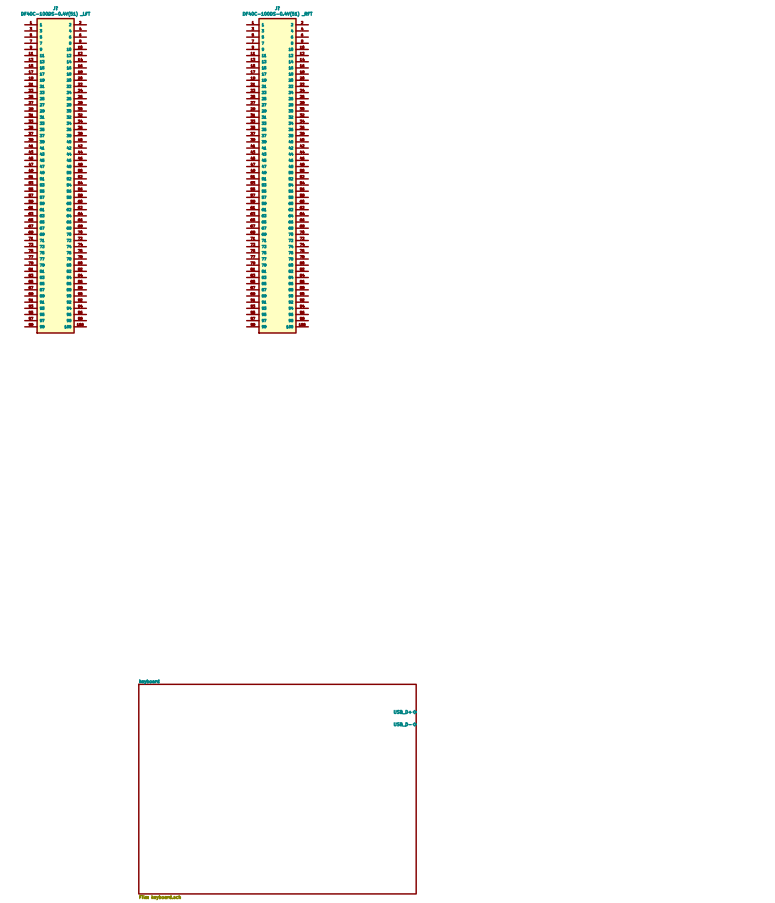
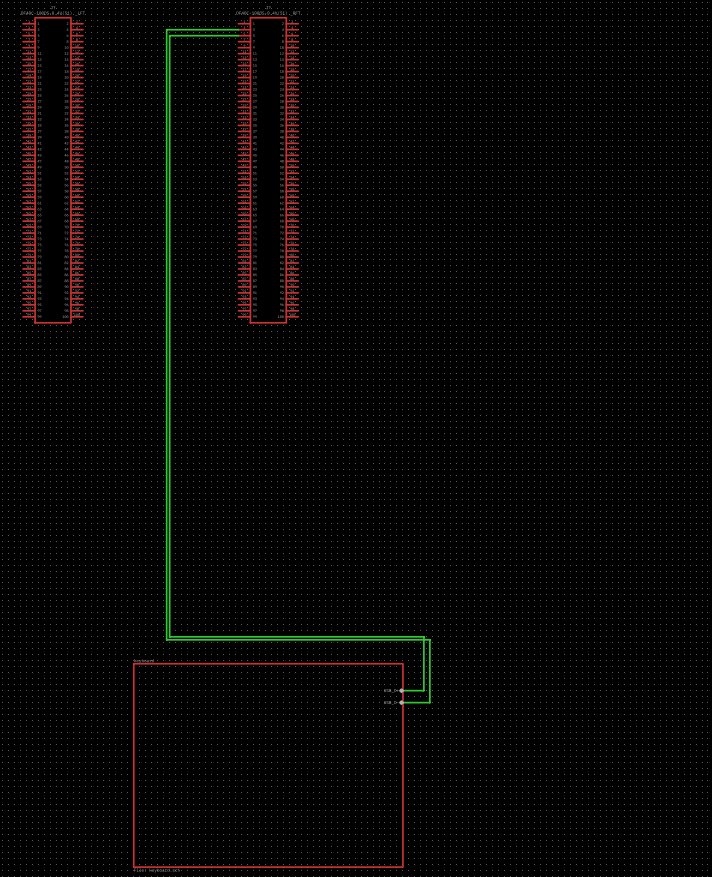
wire: none -> (238, 29) (166, 29) (166, 639) (429, 639) (429, 702) (402, 702)
wire: none -> (238, 35) (169, 35) (169, 636) (423, 636) (423, 690) (402, 690)

